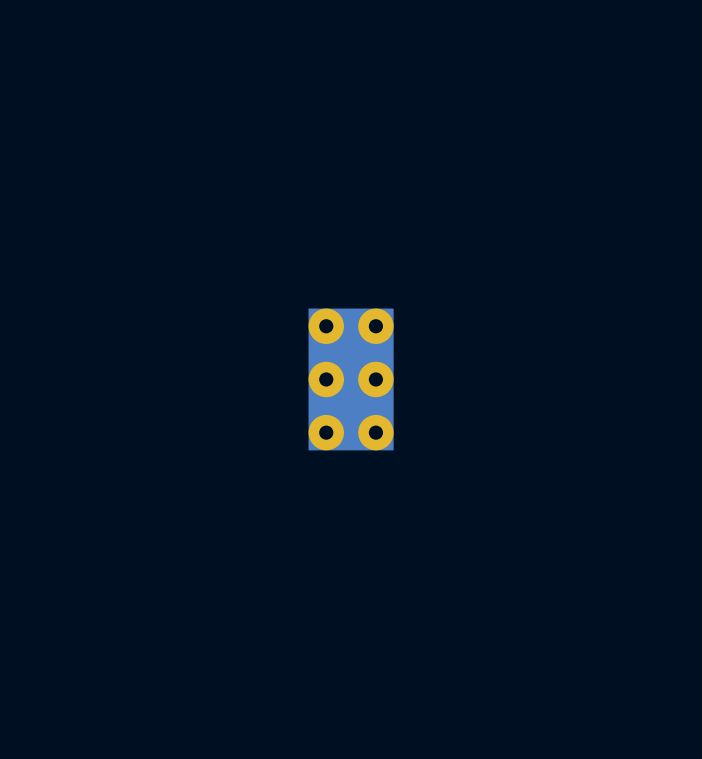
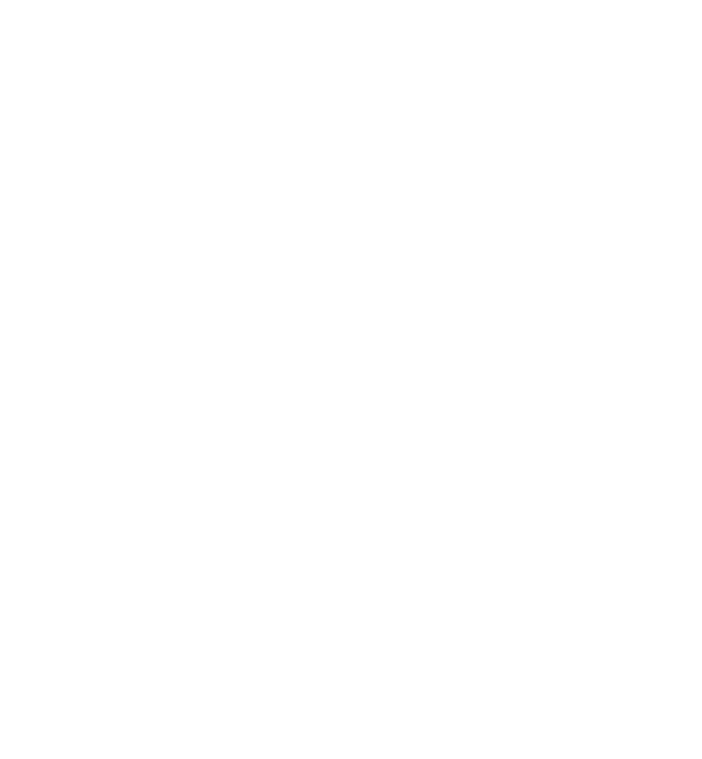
part: (351, 379) -> none

